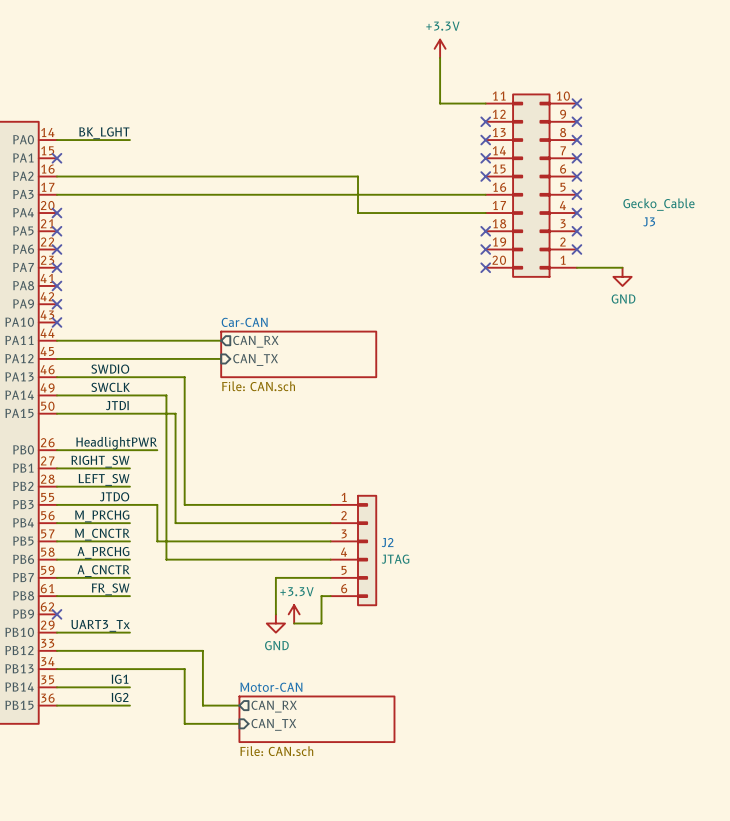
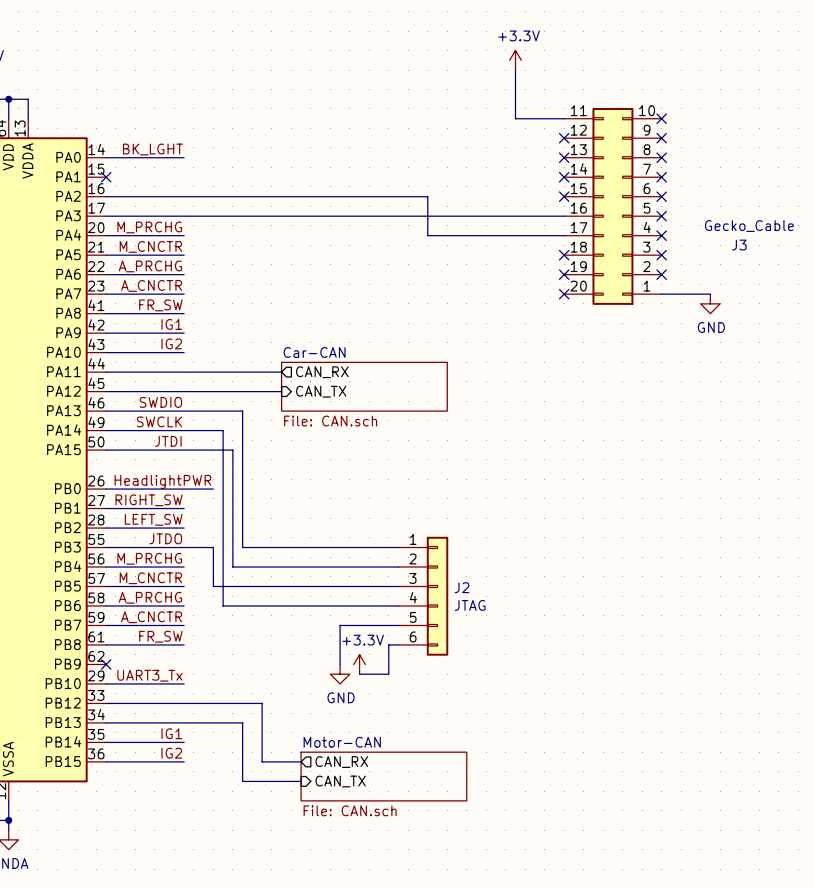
label: none -> M_PRCHG (149, 227)
wire: none -> (106, 235) (184, 235)
no-connect mark: (56, 213) -> none
label: none -> M_CNCTR (150, 246)
wire: none -> (106, 255) (184, 255)
no-connect mark: (56, 231) -> none
label: none -> A_PRCHG (150, 266)
wire: none -> (106, 274) (184, 274)
no-connect mark: (56, 249) -> none
label: none -> A_CNCTR (151, 285)
wire: none -> (106, 294) (184, 294)
no-connect mark: (56, 267) -> none
label: none -> FR_SW (160, 305)
wire: none -> (106, 313) (184, 313)
no-connect mark: (56, 285) -> none
label: none -> IG1 (171, 324)
wire: none -> (106, 333) (184, 333)
no-connect mark: (56, 304) -> none
label: none -> IG2 (171, 343)
wire: none -> (106, 352) (184, 352)
no-connect mark: (56, 322) -> none

